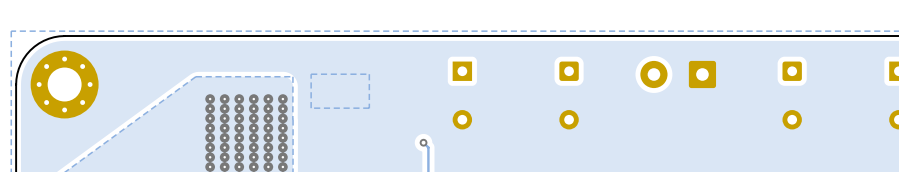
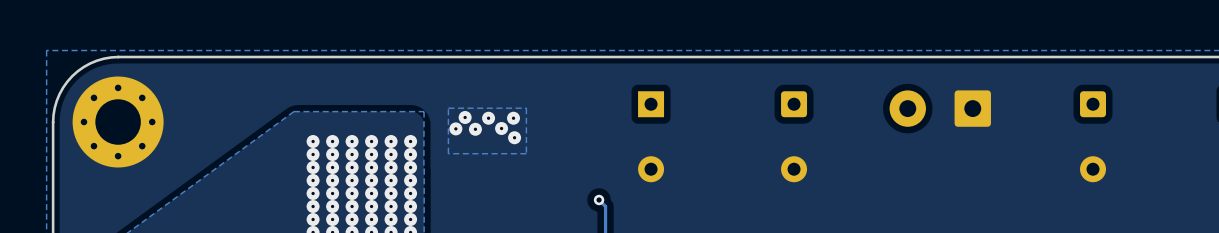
via: none -> (465, 117)
via: none -> (488, 118)
via: none -> (513, 118)
via: none -> (455, 128)
via: none -> (475, 129)
via: none -> (501, 128)
via: none -> (514, 137)

